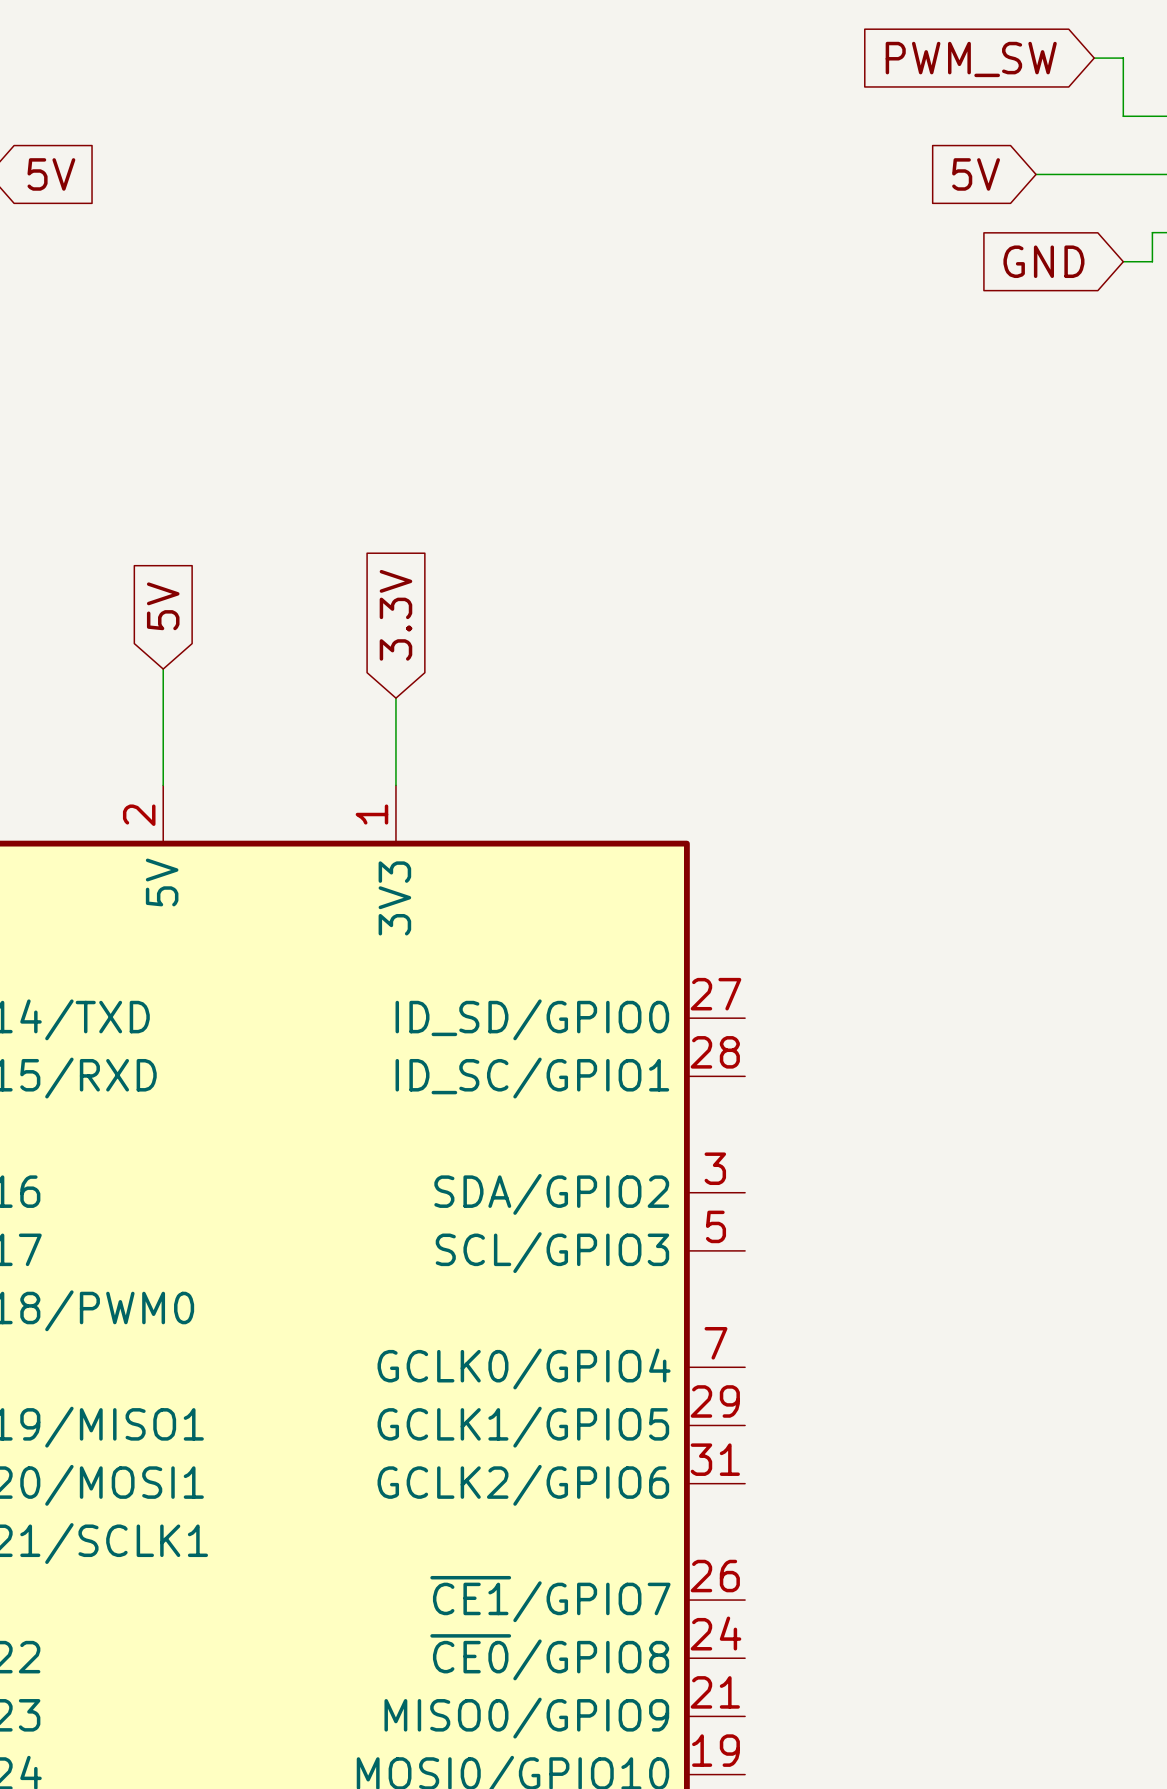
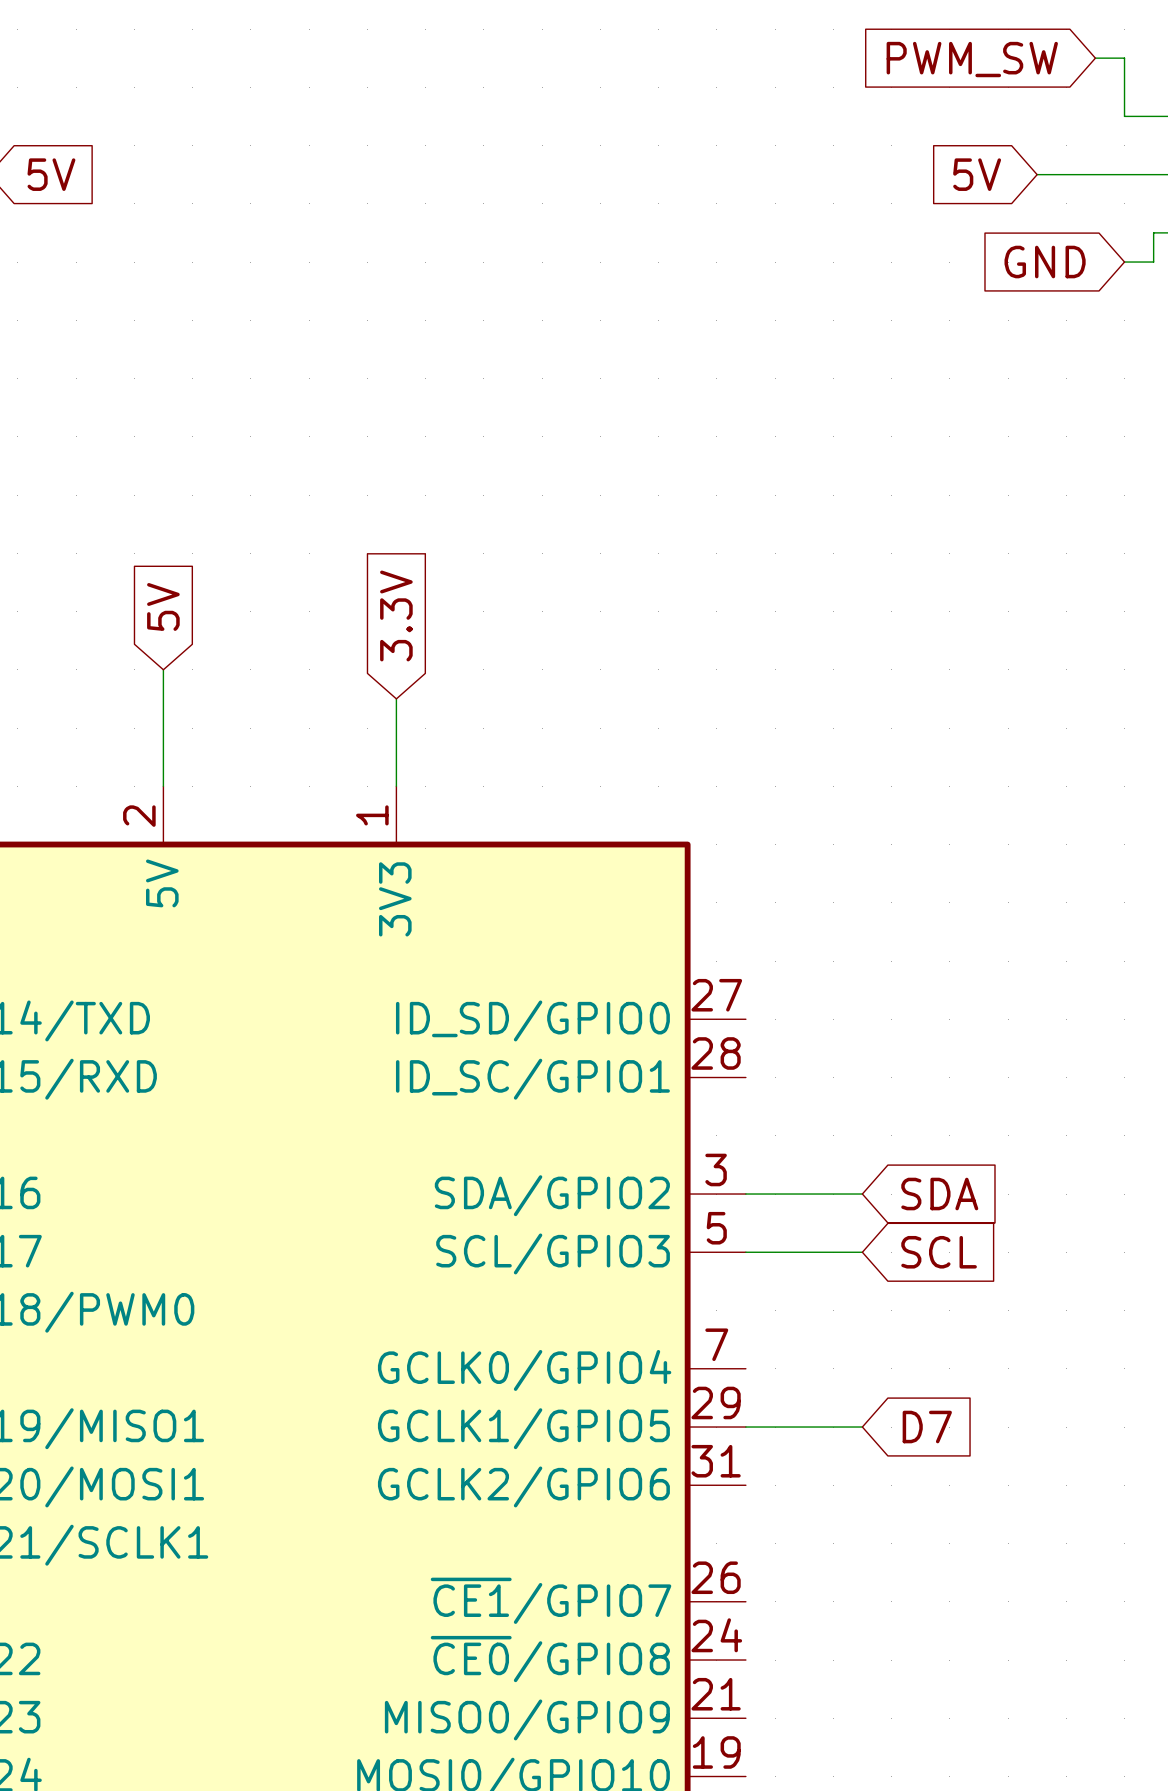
wire: none -> (745, 1194) (862, 1194)
global label: none -> SDA (939, 1194)
wire: none -> (745, 1252) (862, 1252)
global label: none -> SCL (939, 1252)
wire: none -> (745, 1427) (862, 1427)
global label: none -> D7 (927, 1427)

